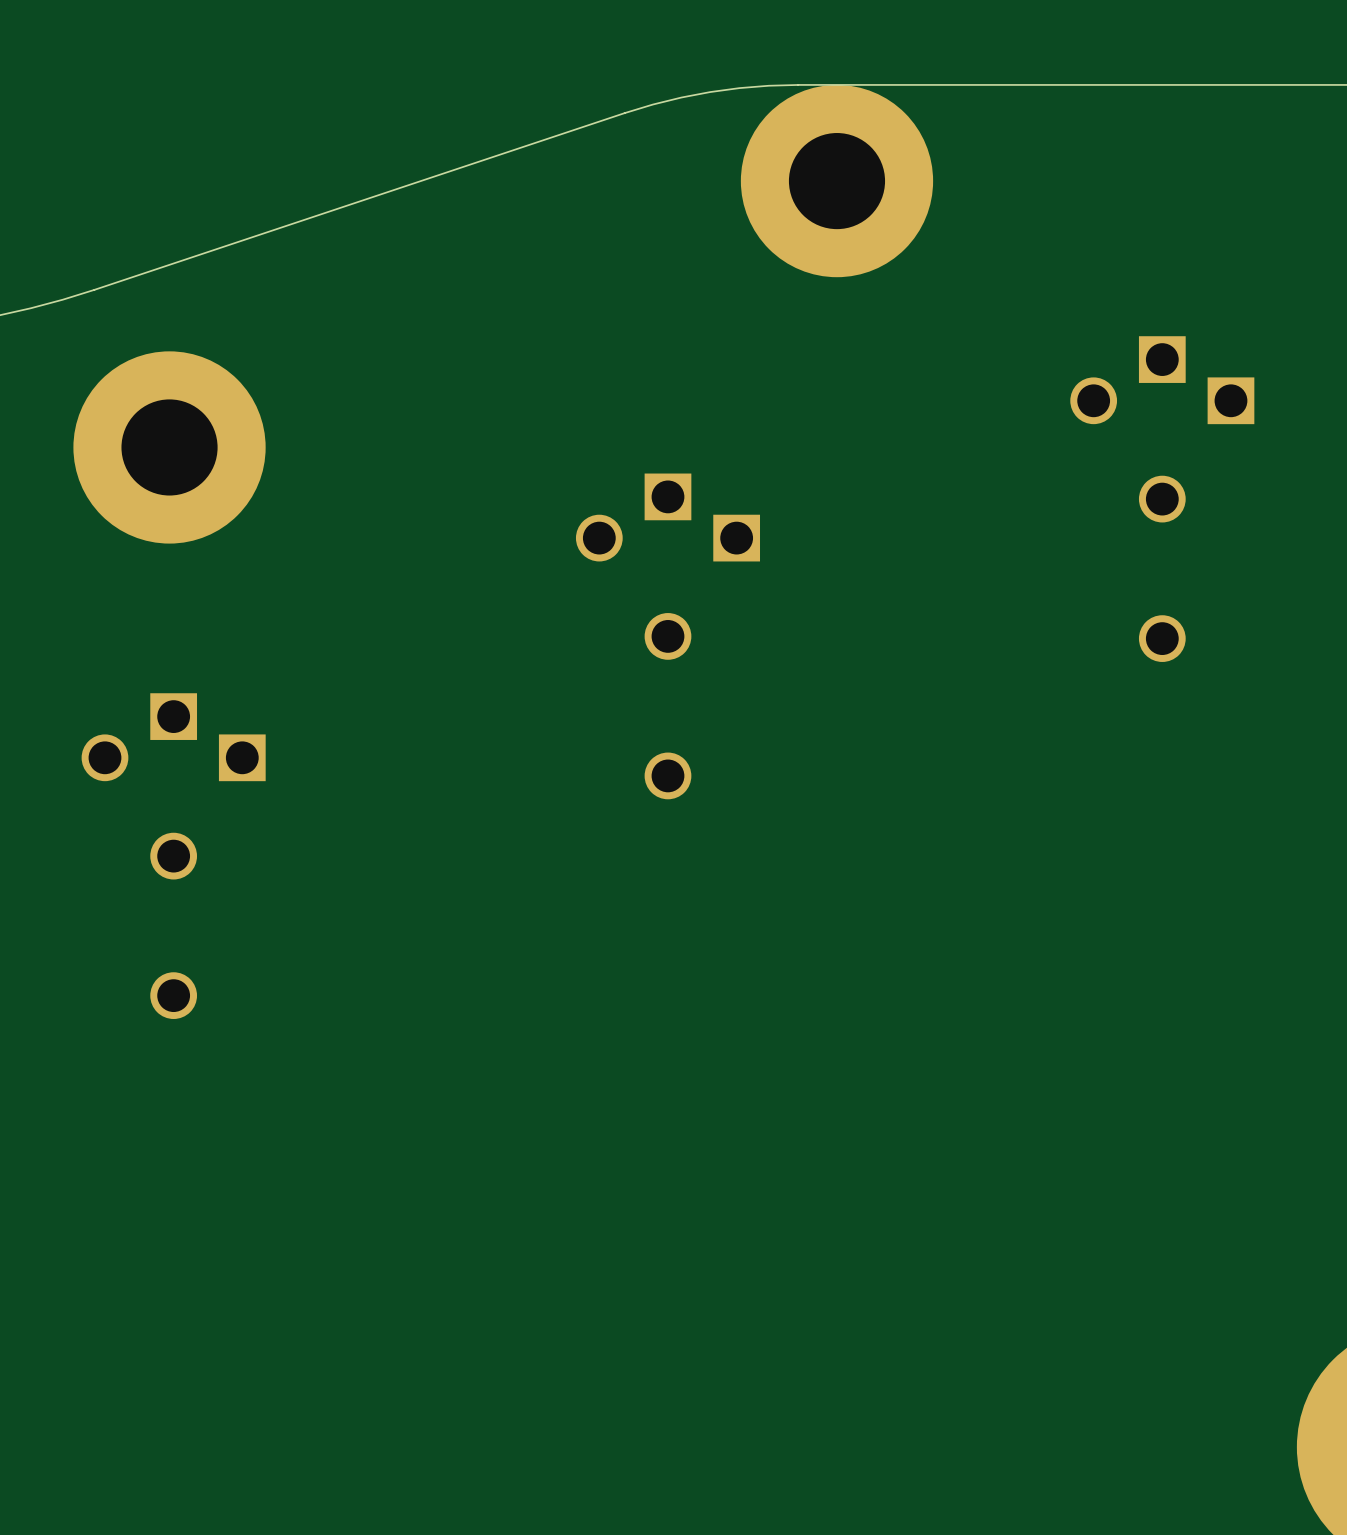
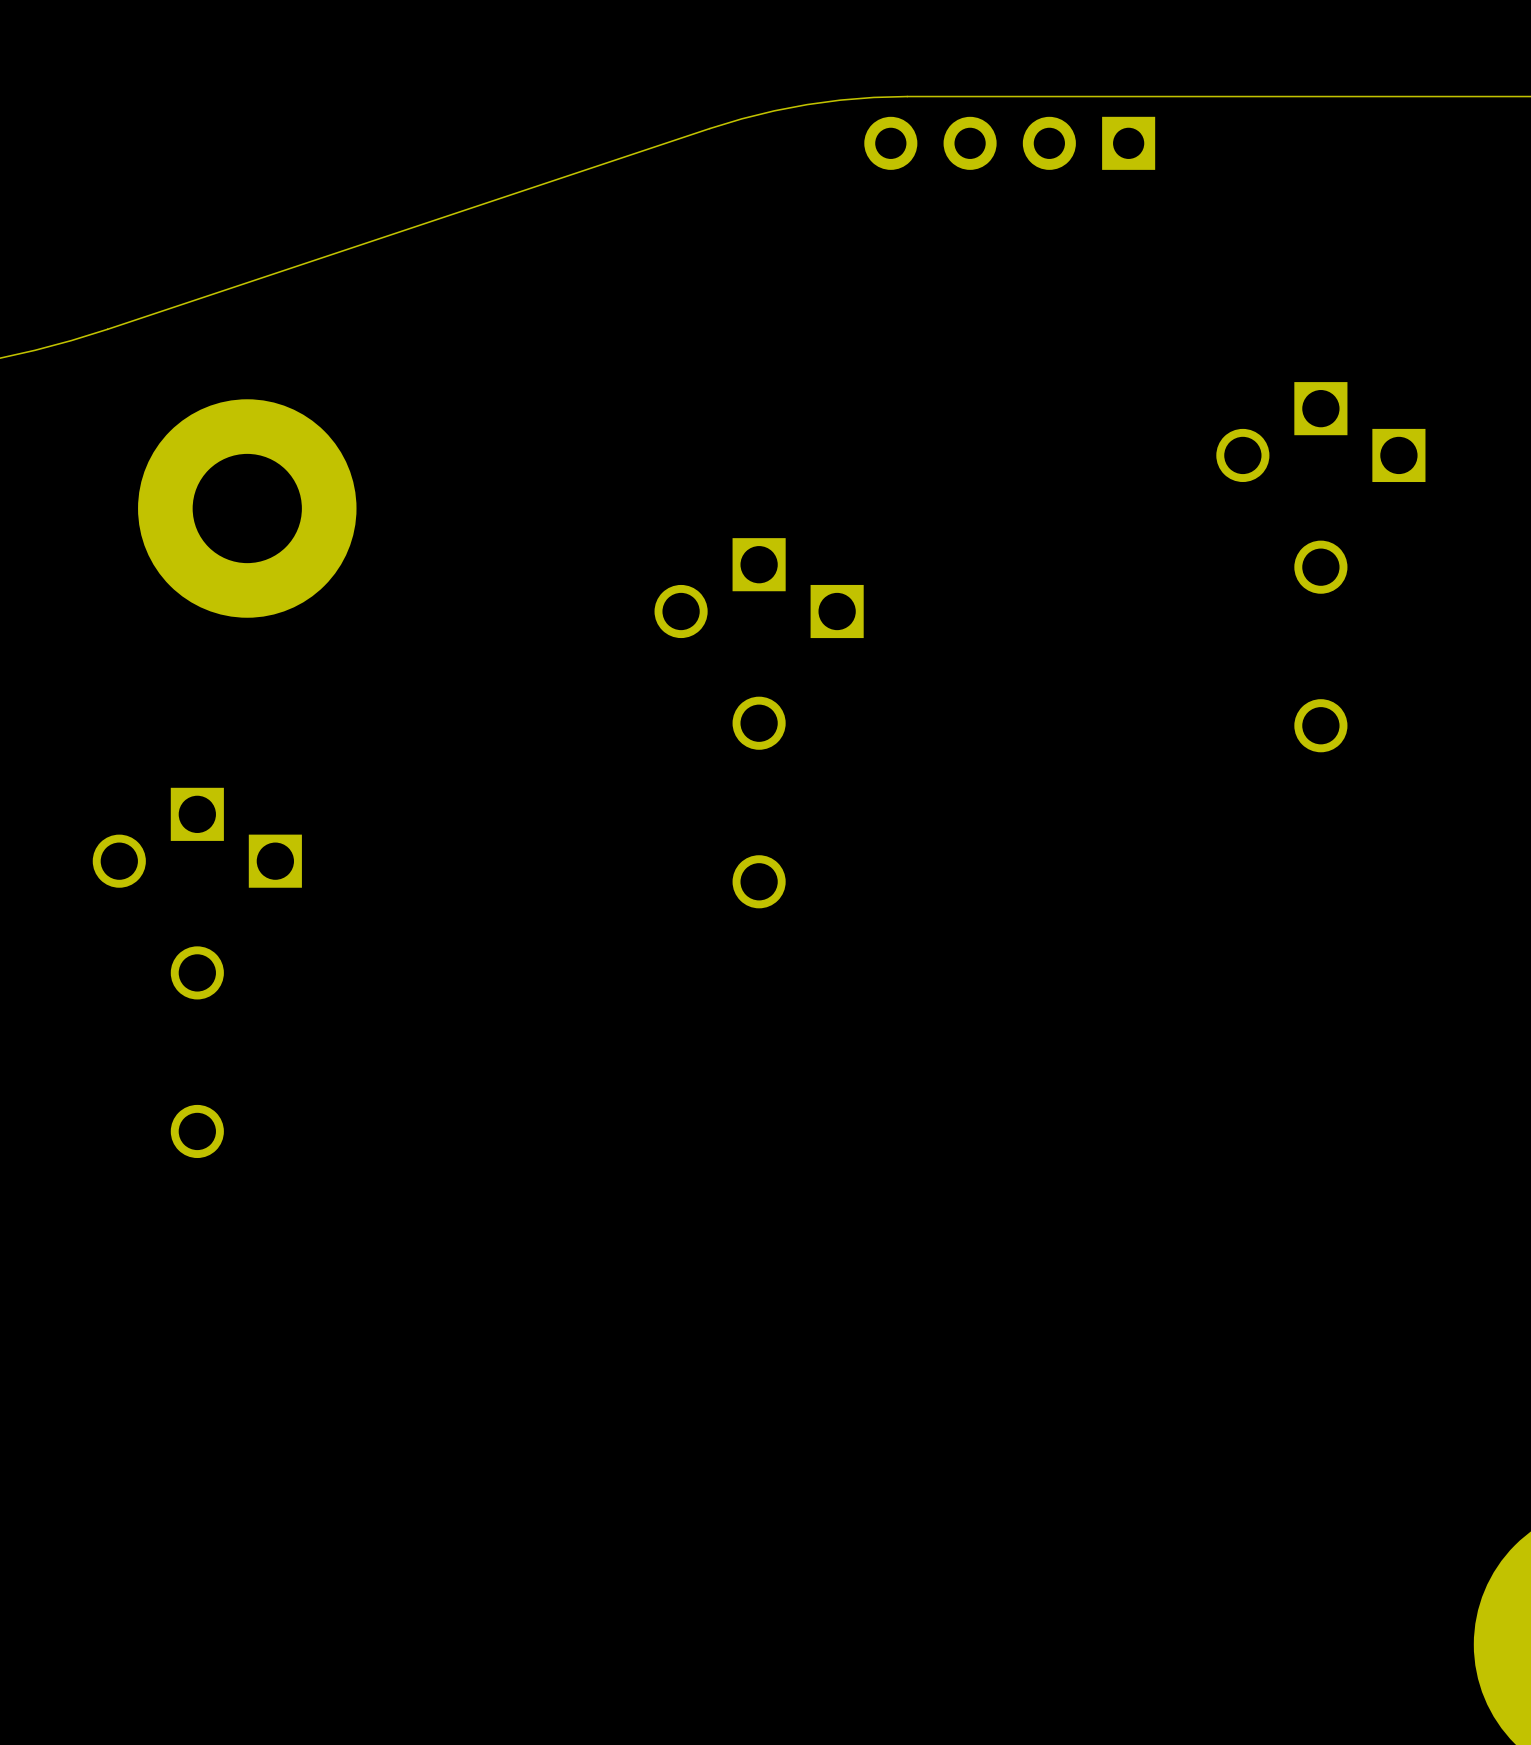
part: none -> (1009, 143)
part: (836, 181) -> none
part position: (169, 447) -> (247, 508)

